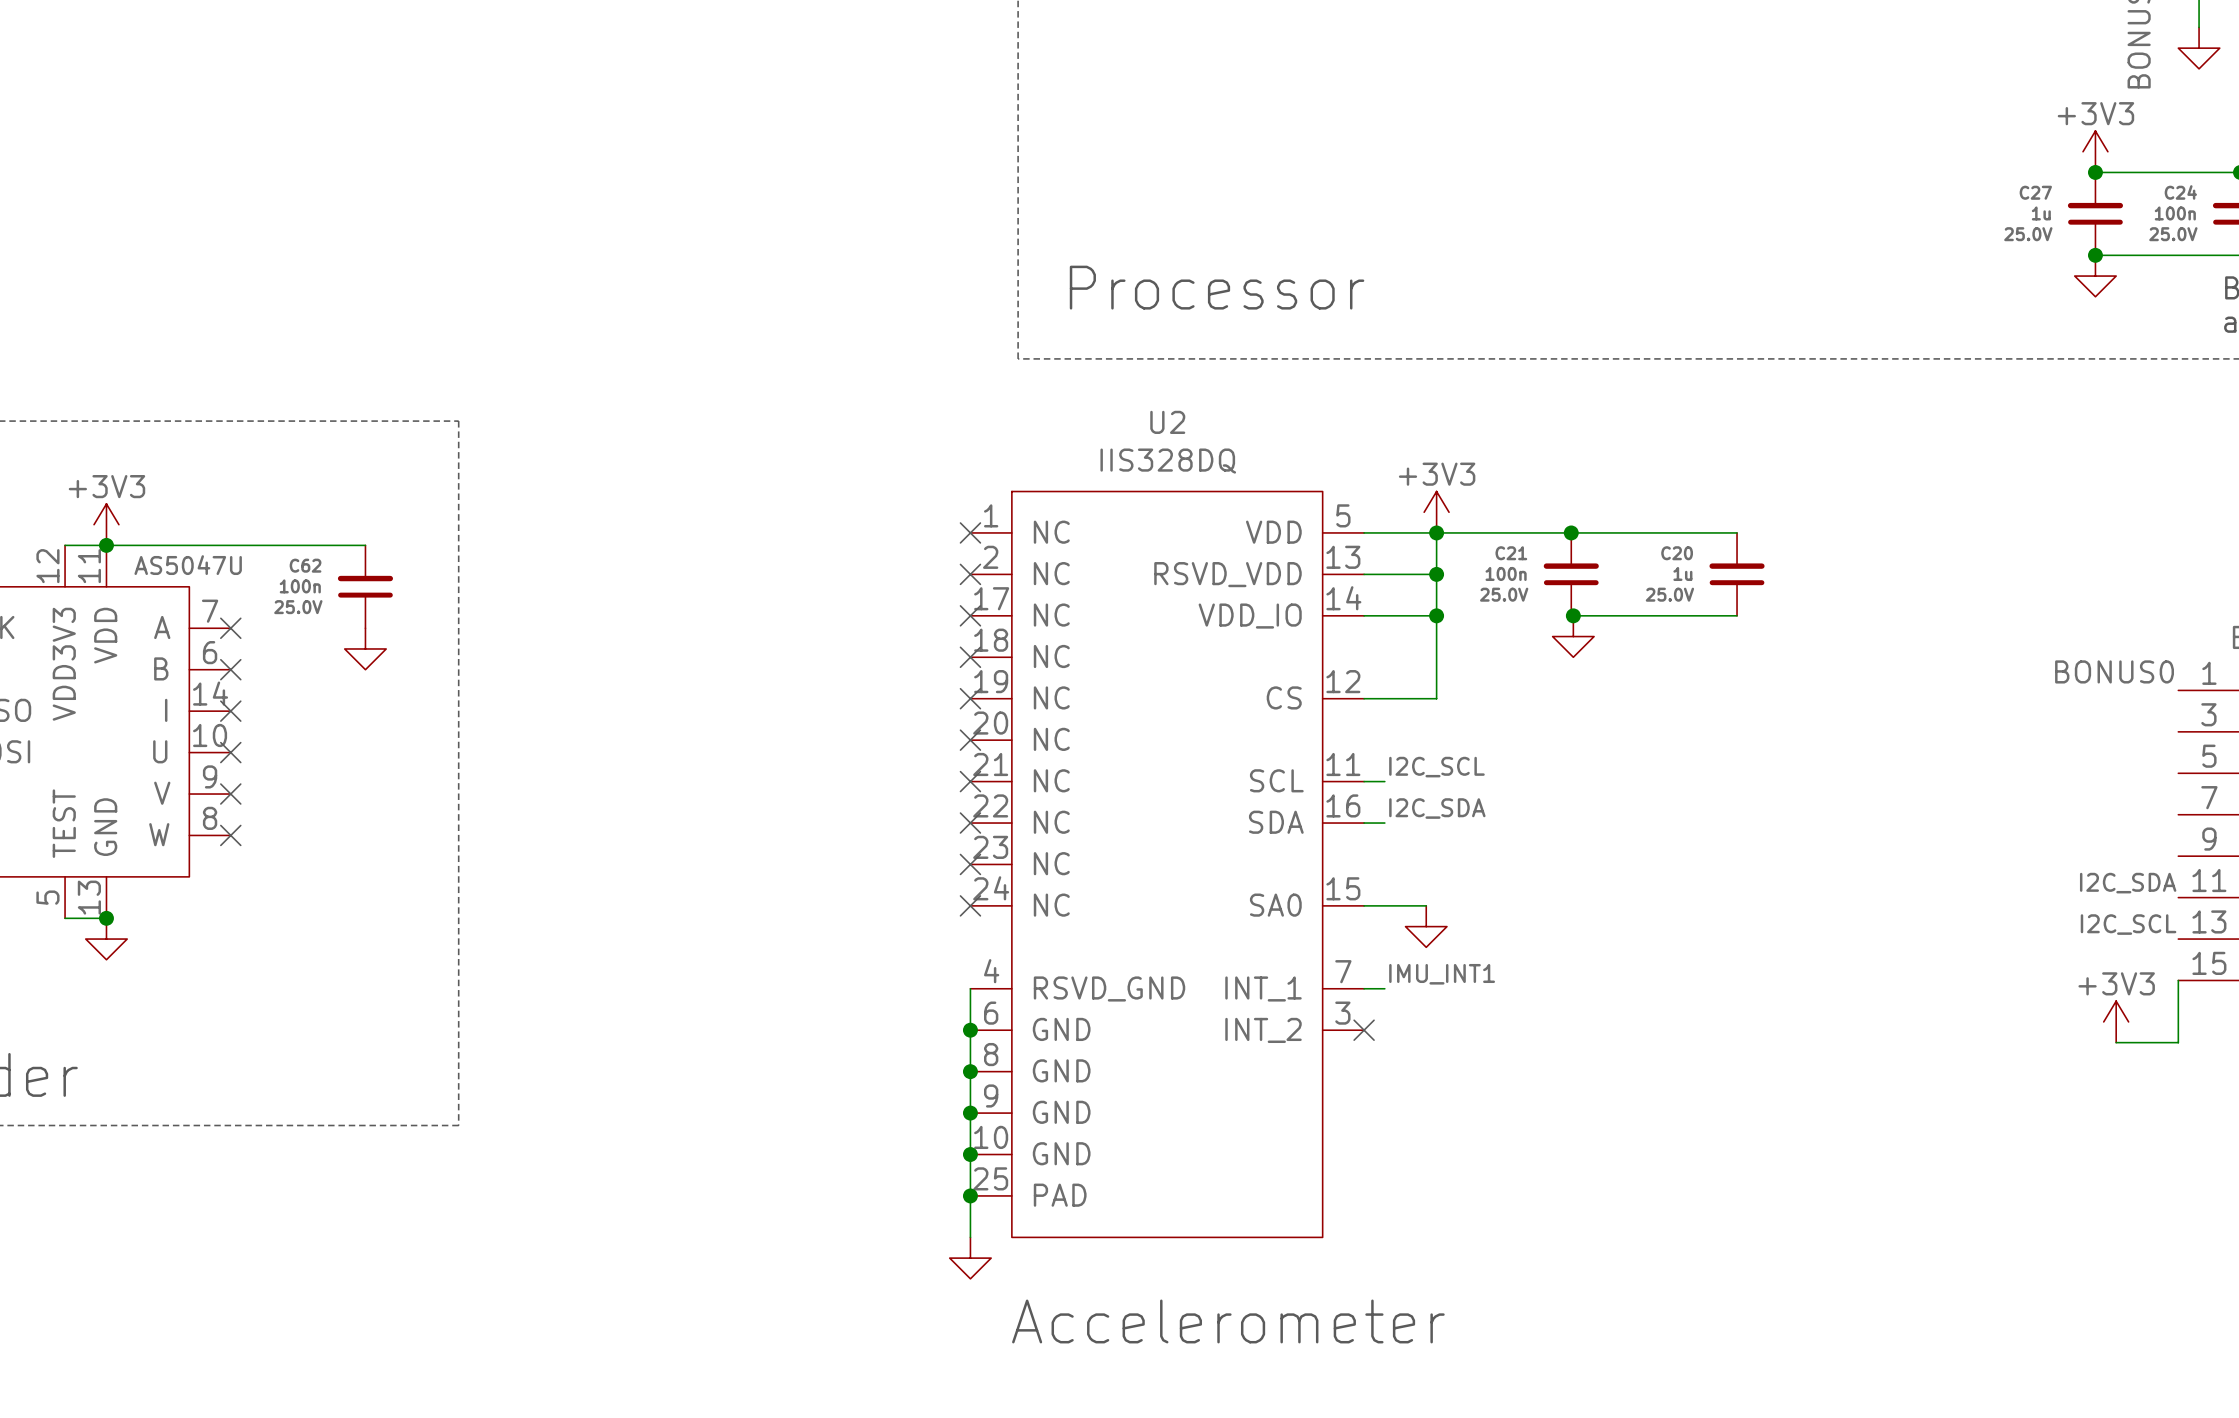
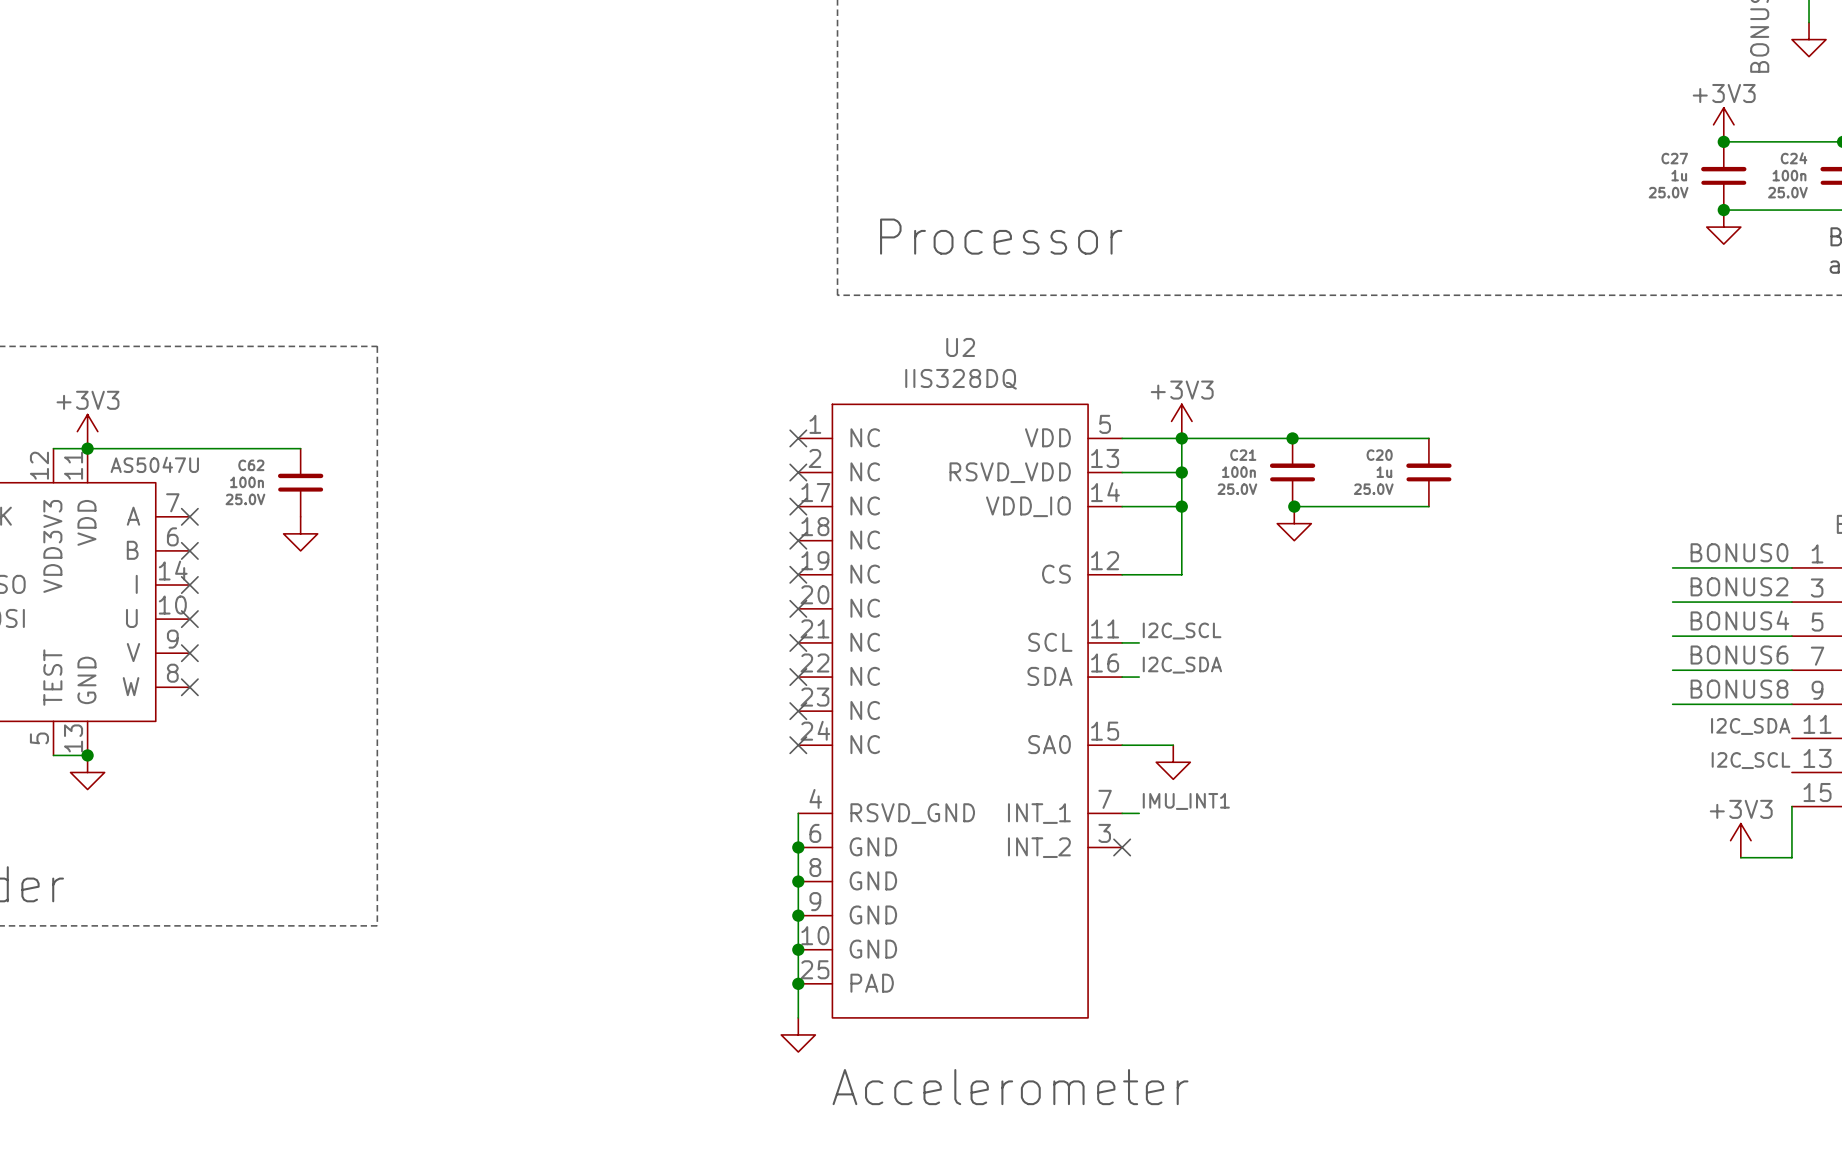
wire: none -> (1672, 567) (1791, 567)
label: none -> BONUS2 (1739, 586)
wire: none -> (1672, 602) (1791, 602)
label: none -> BONUS4 (1739, 620)
wire: none -> (1672, 636) (1791, 636)
label: none -> BONUS6 (1739, 655)
wire: none -> (1672, 670) (1791, 670)
label: none -> BONUS8 (1739, 689)
wire: none -> (1672, 704) (1791, 704)

